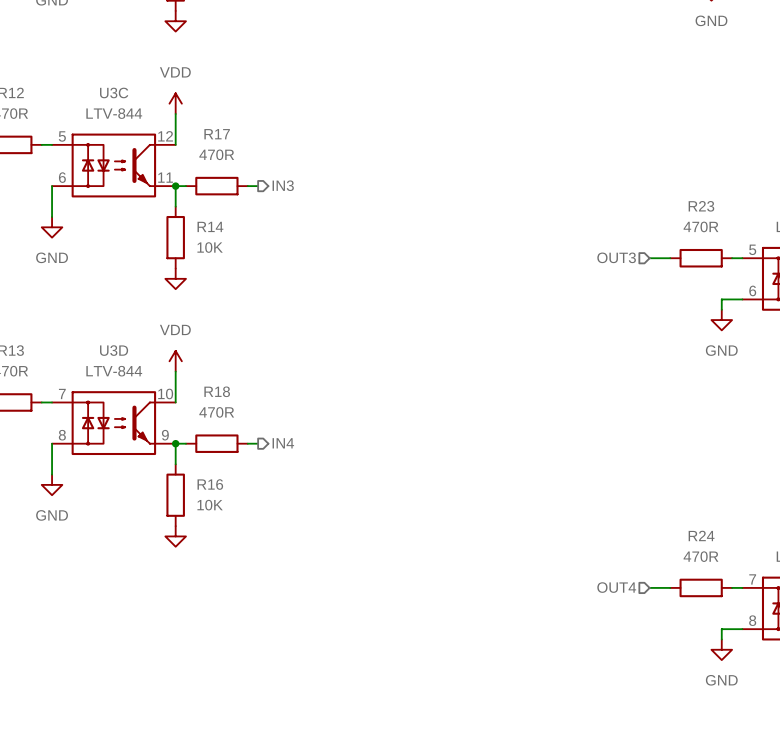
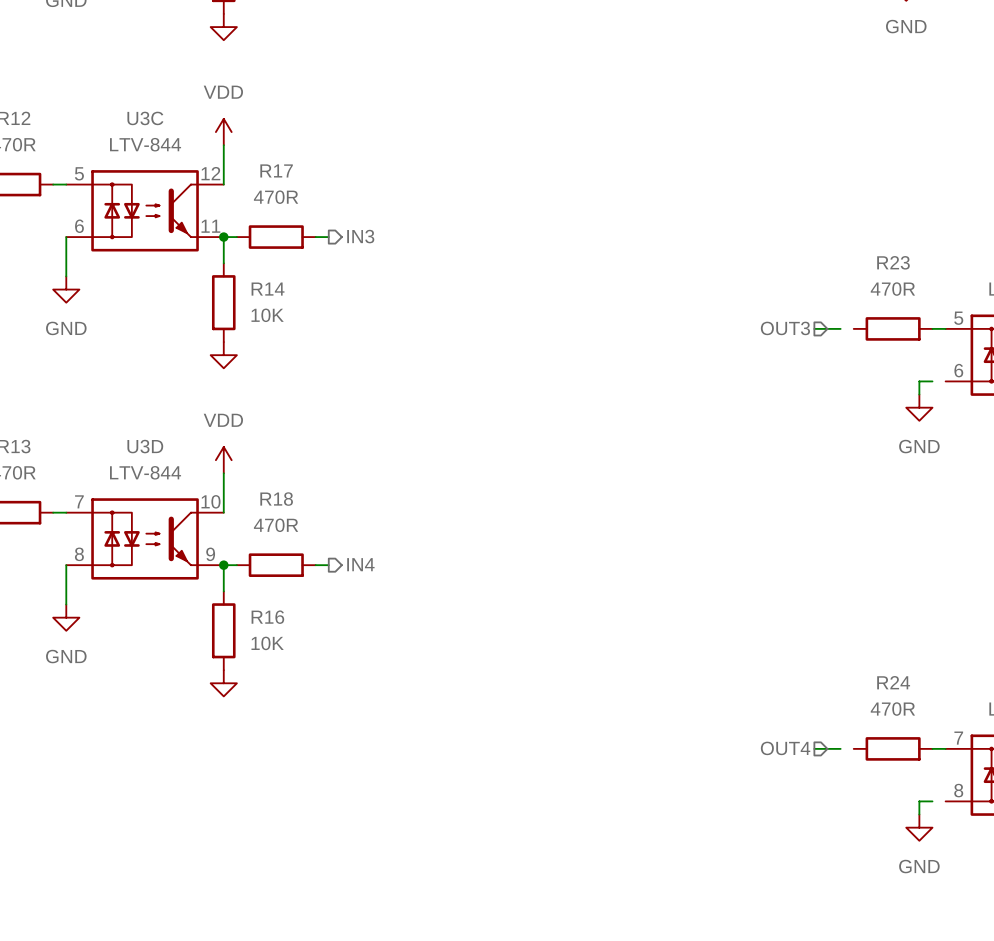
wire: (659, 258) (670, 258) -> (814, 328) (827, 328)
wire: (732, 299) (742, 299) -> none
wire: (659, 587) (670, 587) -> (814, 748) (827, 748)
wire: (732, 629) (742, 629) -> none

